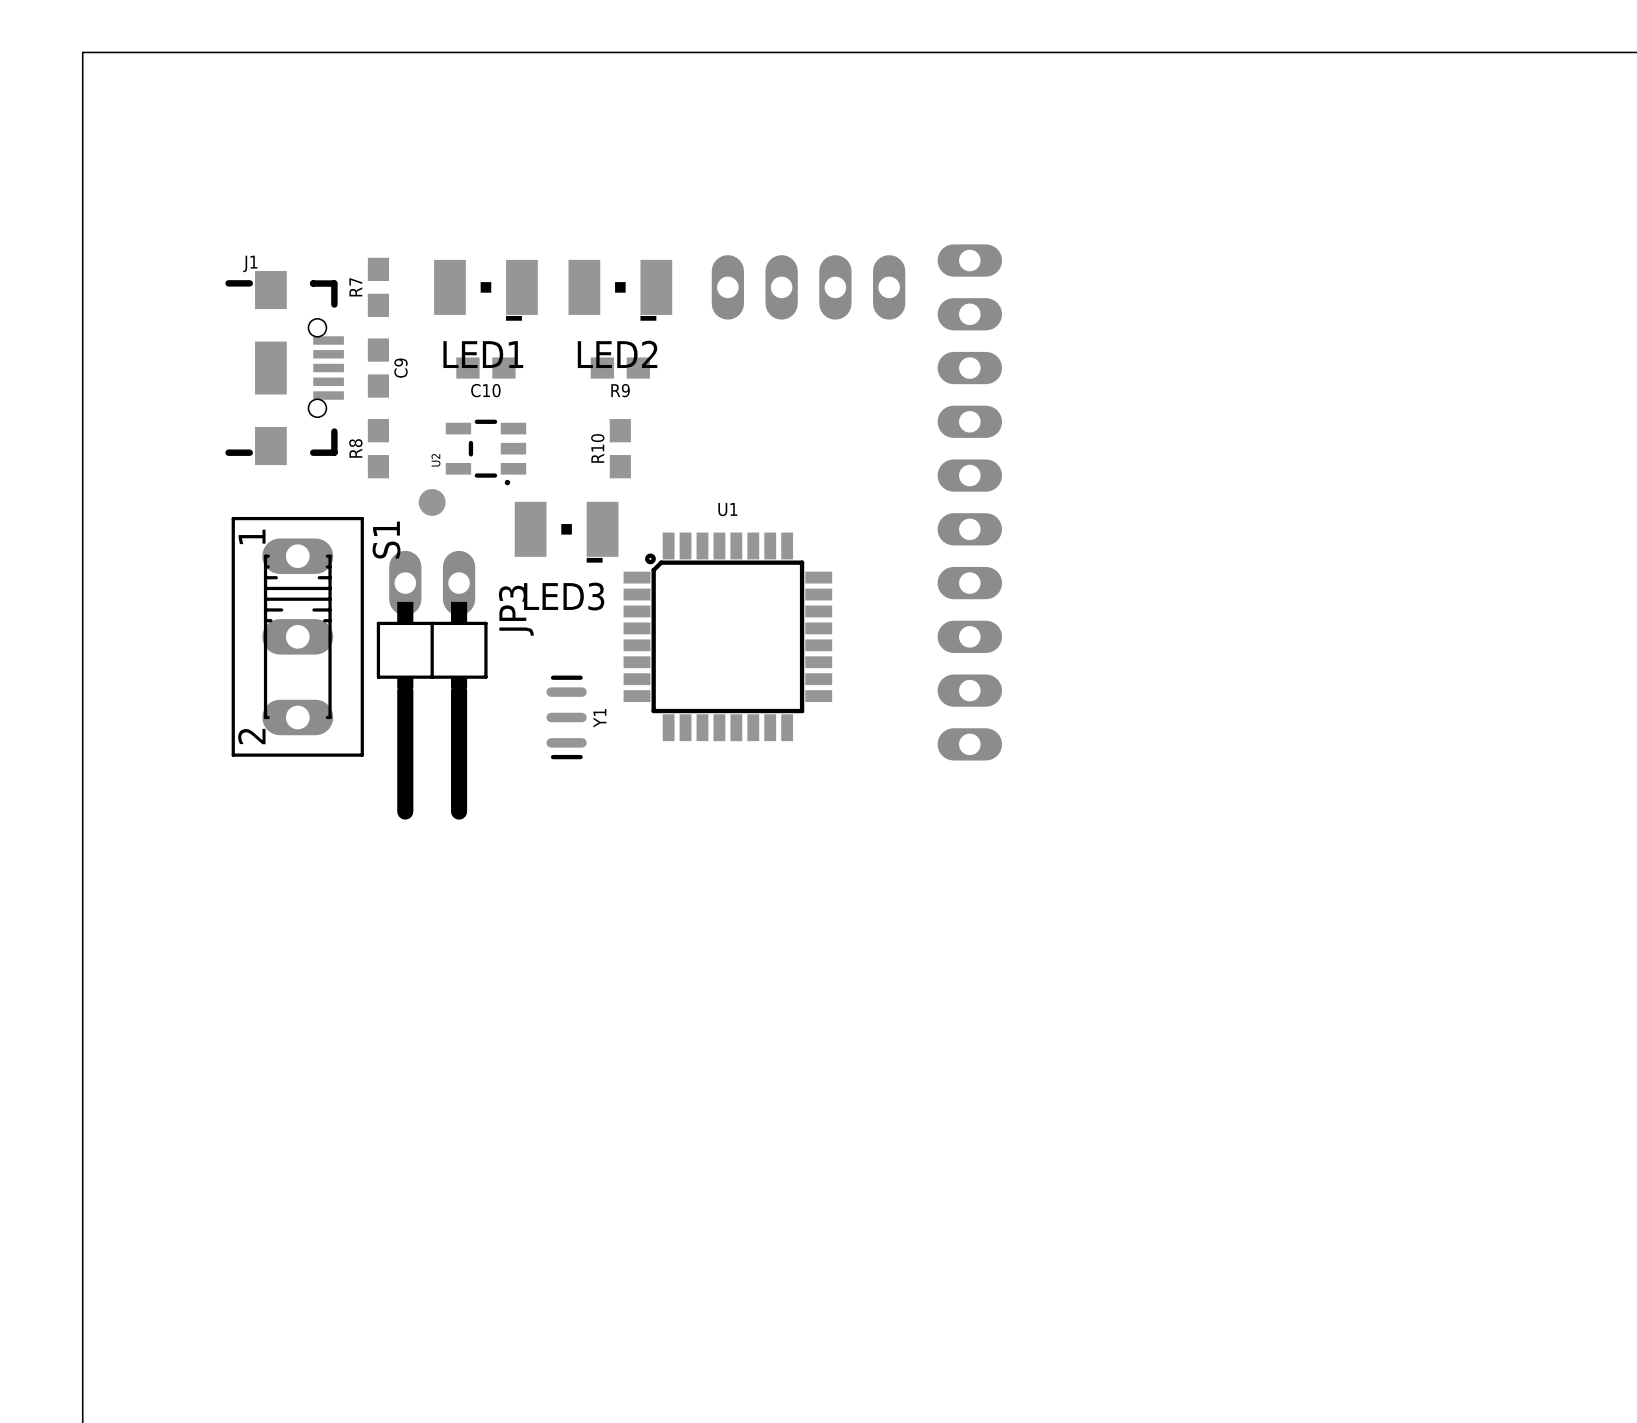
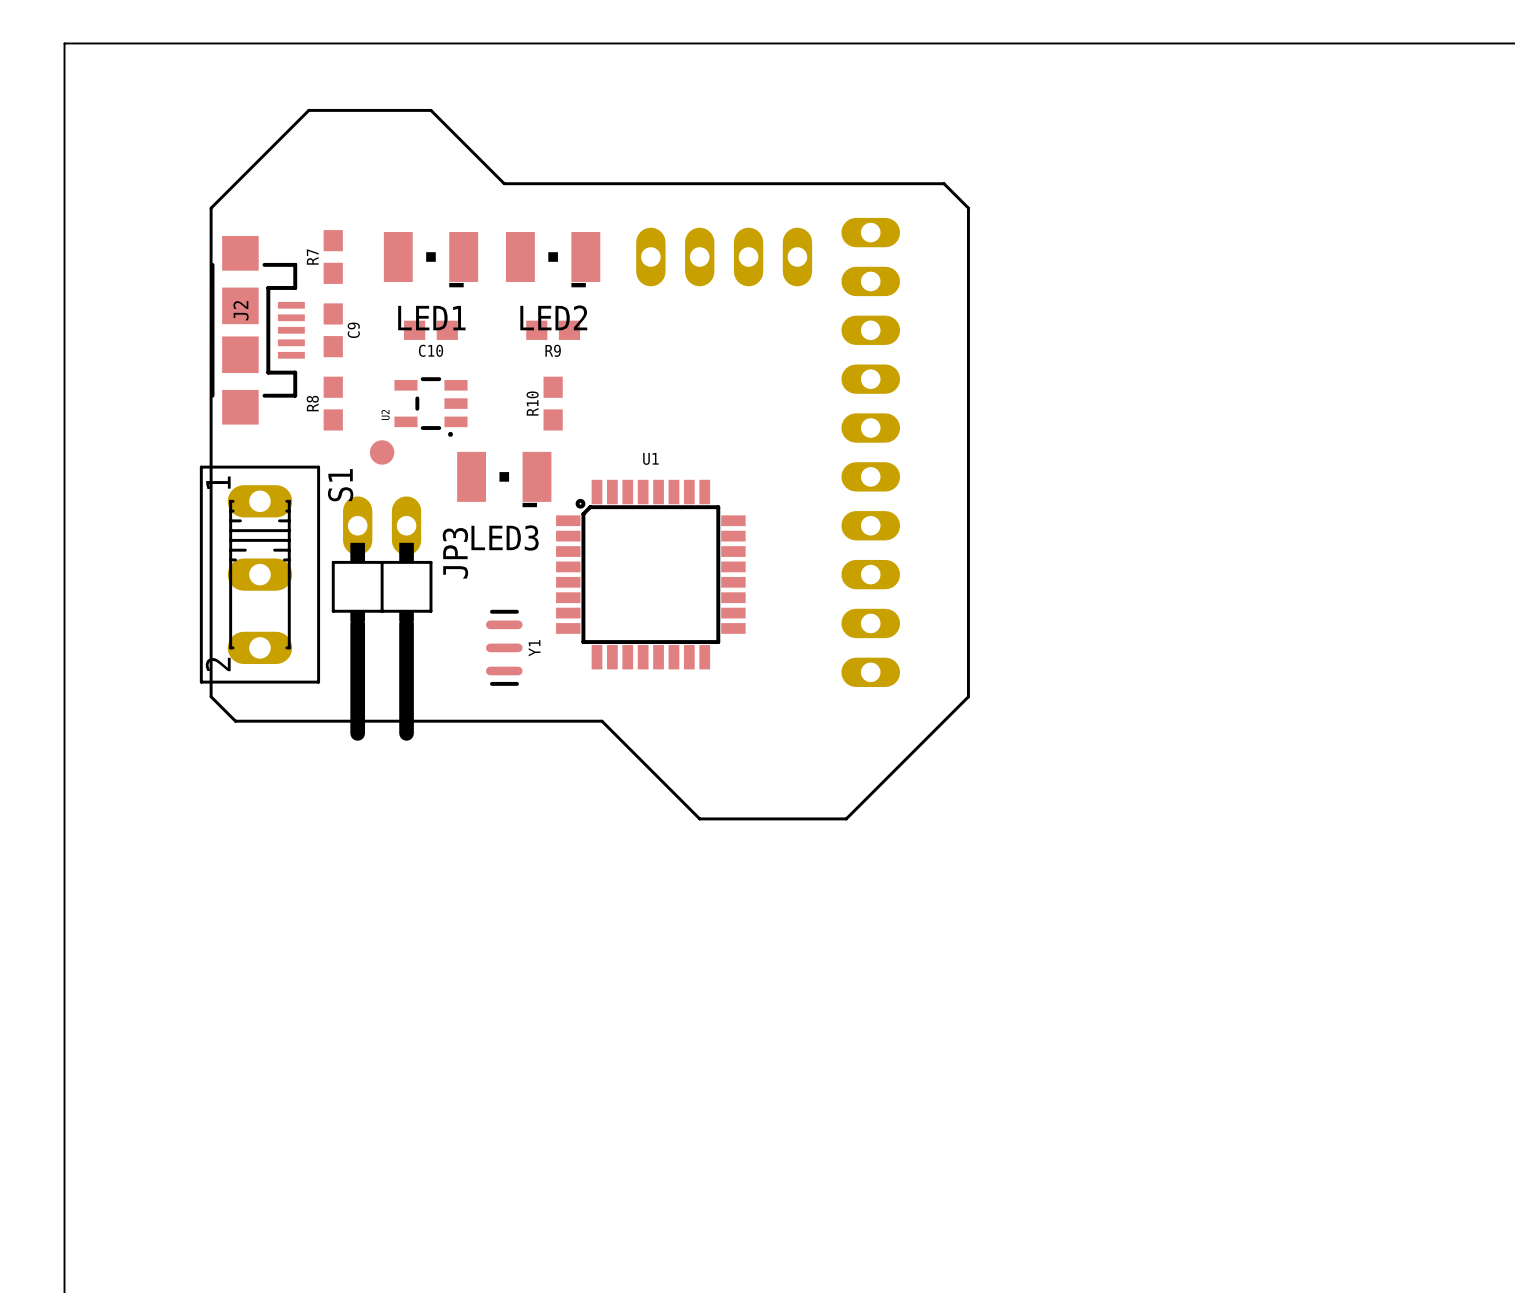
board edge: none -> (308, 110) (211, 208) (211, 696) (235, 721) (601, 721) (699, 818) (846, 818) (968, 696) (968, 208) (944, 183) (504, 183) (430, 110) (308, 110)
J1: (284, 368) -> none
J2: none -> (257, 330)

